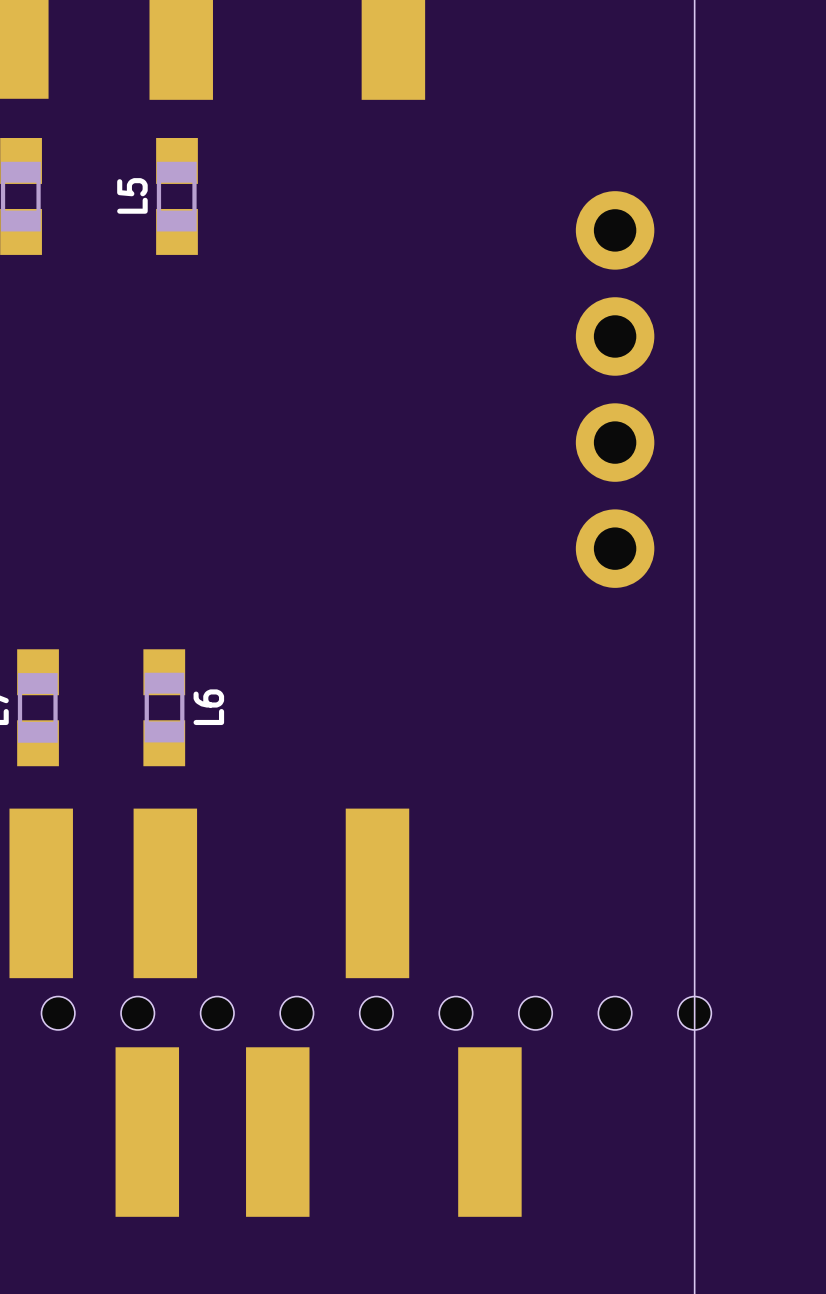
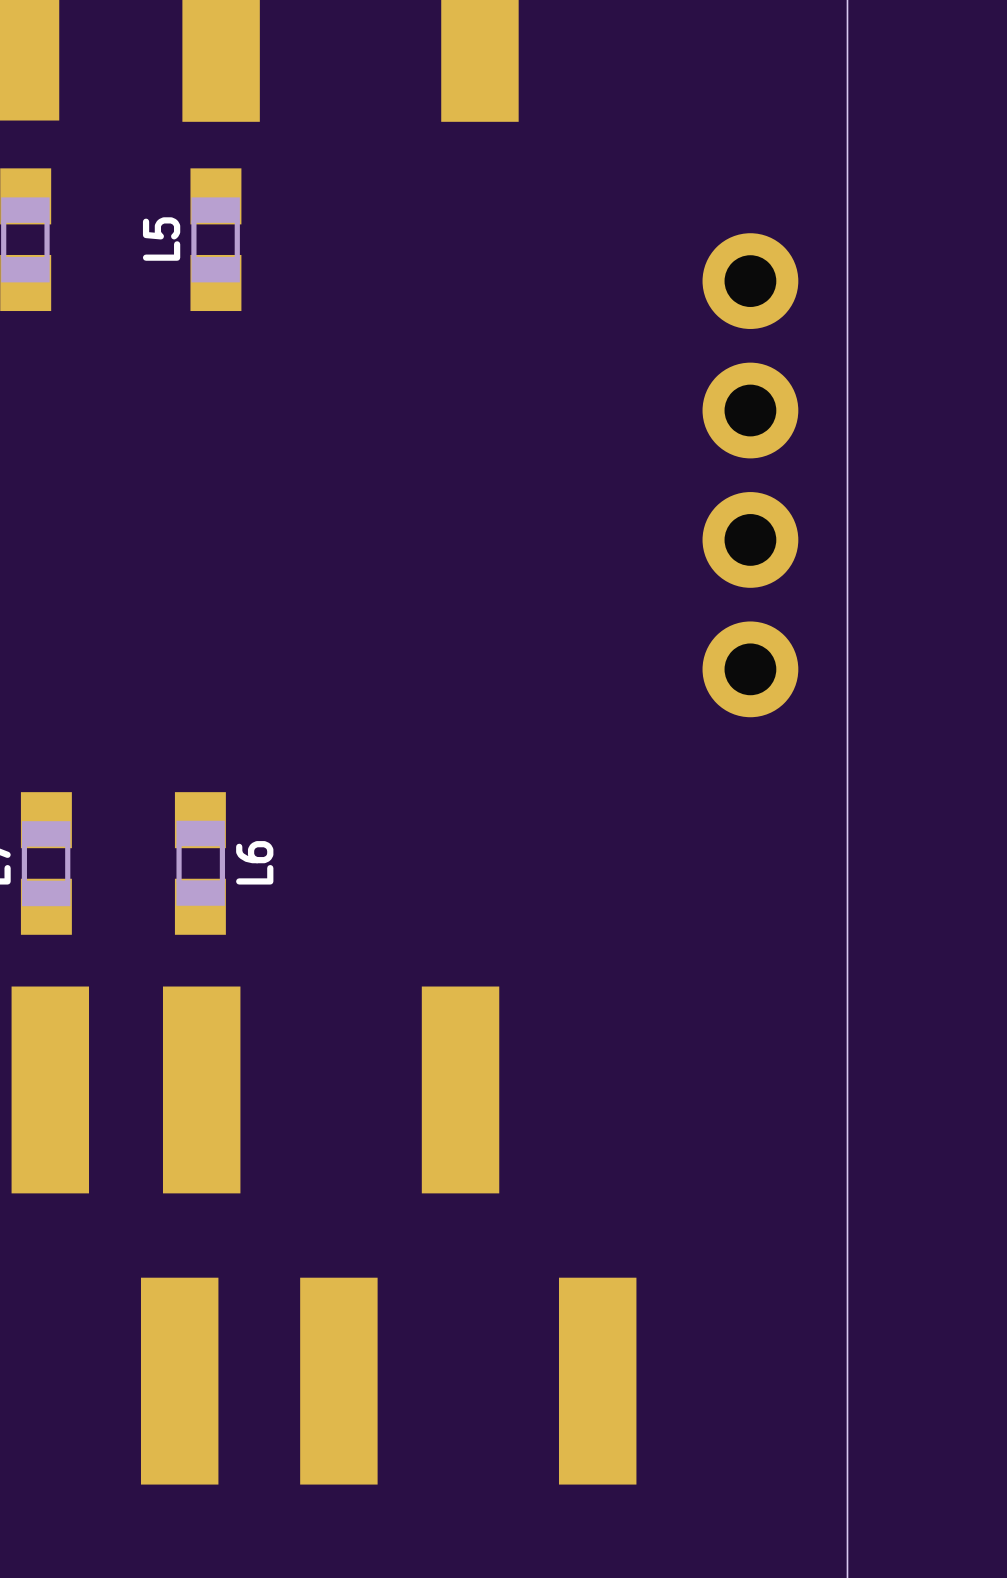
hole: (58, 1013) -> none
hole: (137, 1013) -> none
hole: (217, 1013) -> none
hole: (296, 1013) -> none
hole: (376, 1013) -> none
hole: (455, 1013) -> none
hole: (535, 1013) -> none
hole: (615, 1013) -> none
hole: (694, 1013) -> none

